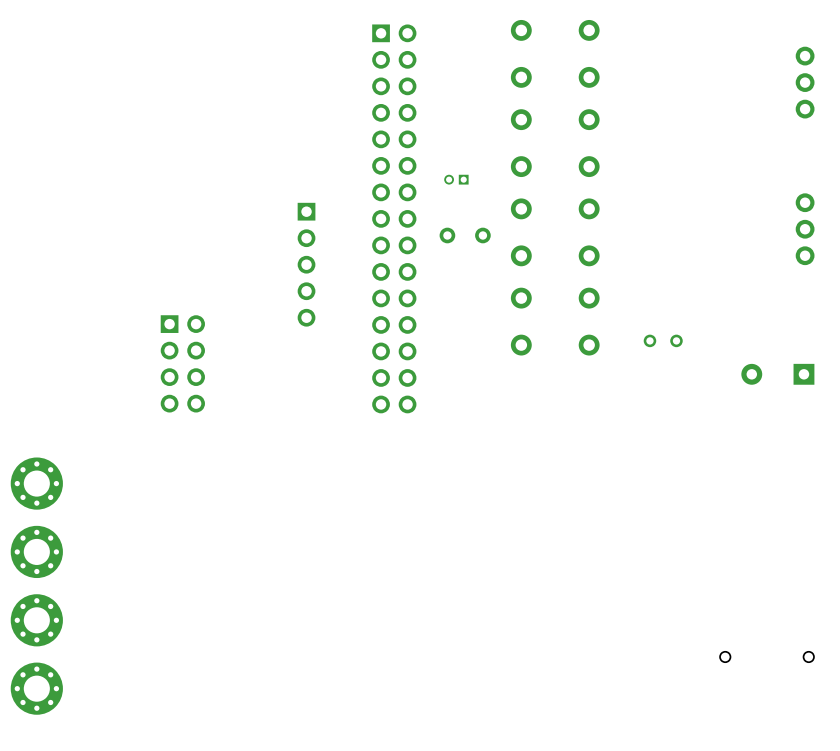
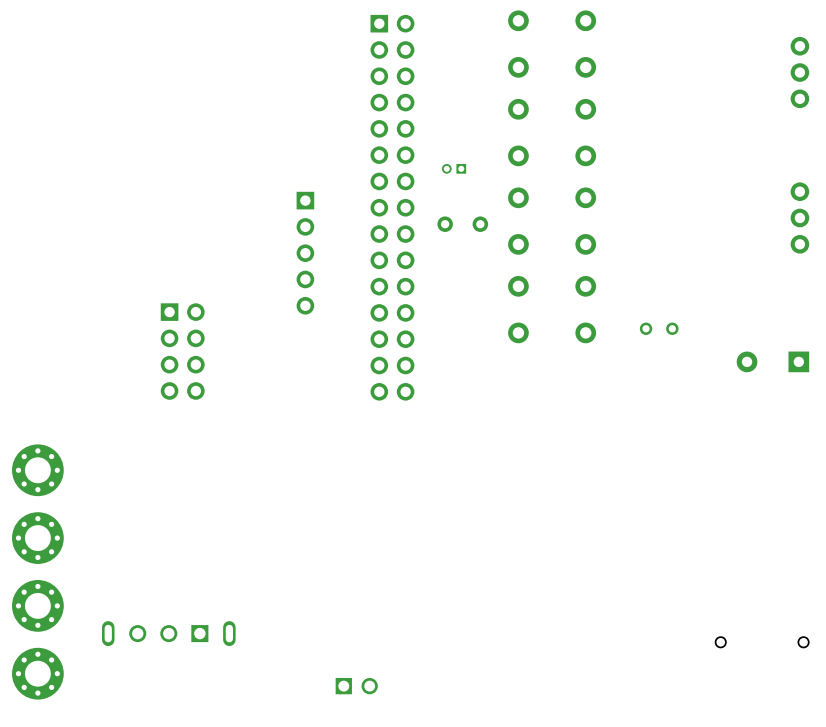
part: none -> (168, 633)
part: none -> (356, 686)

